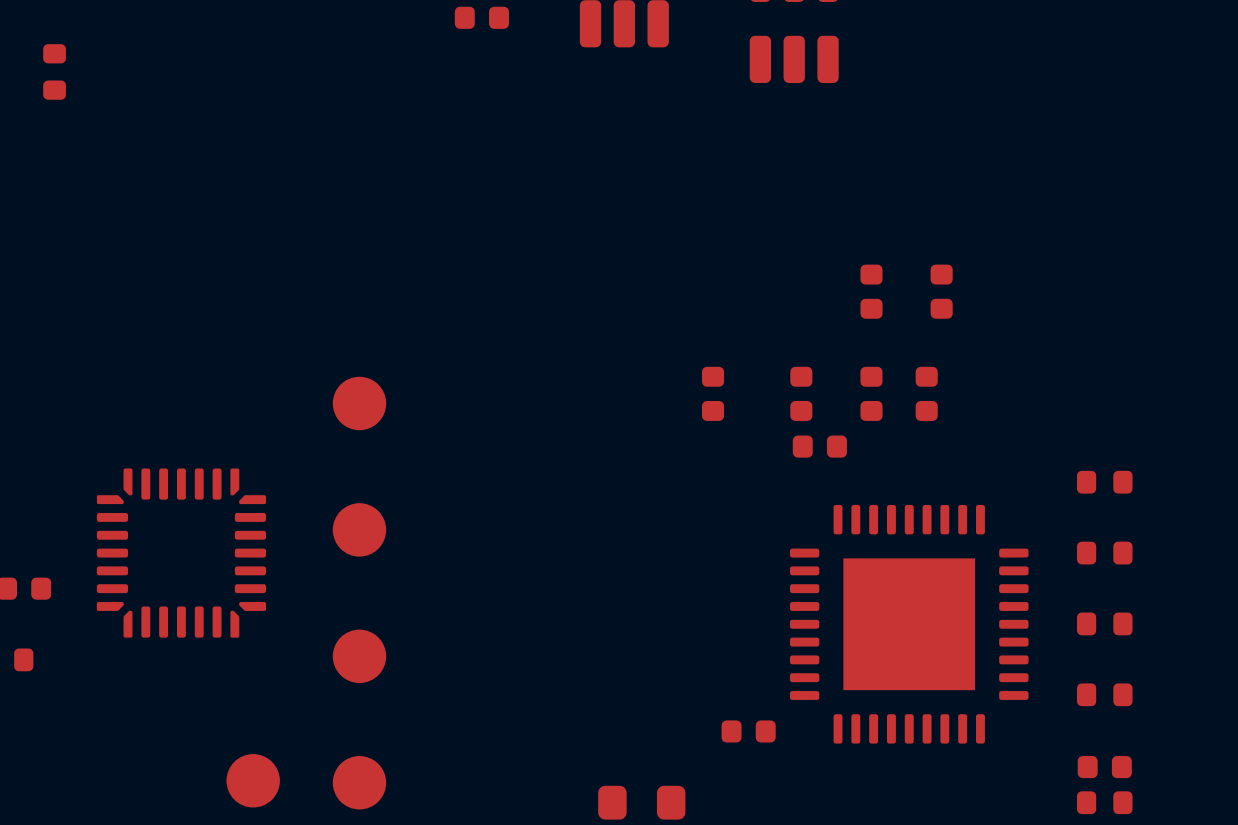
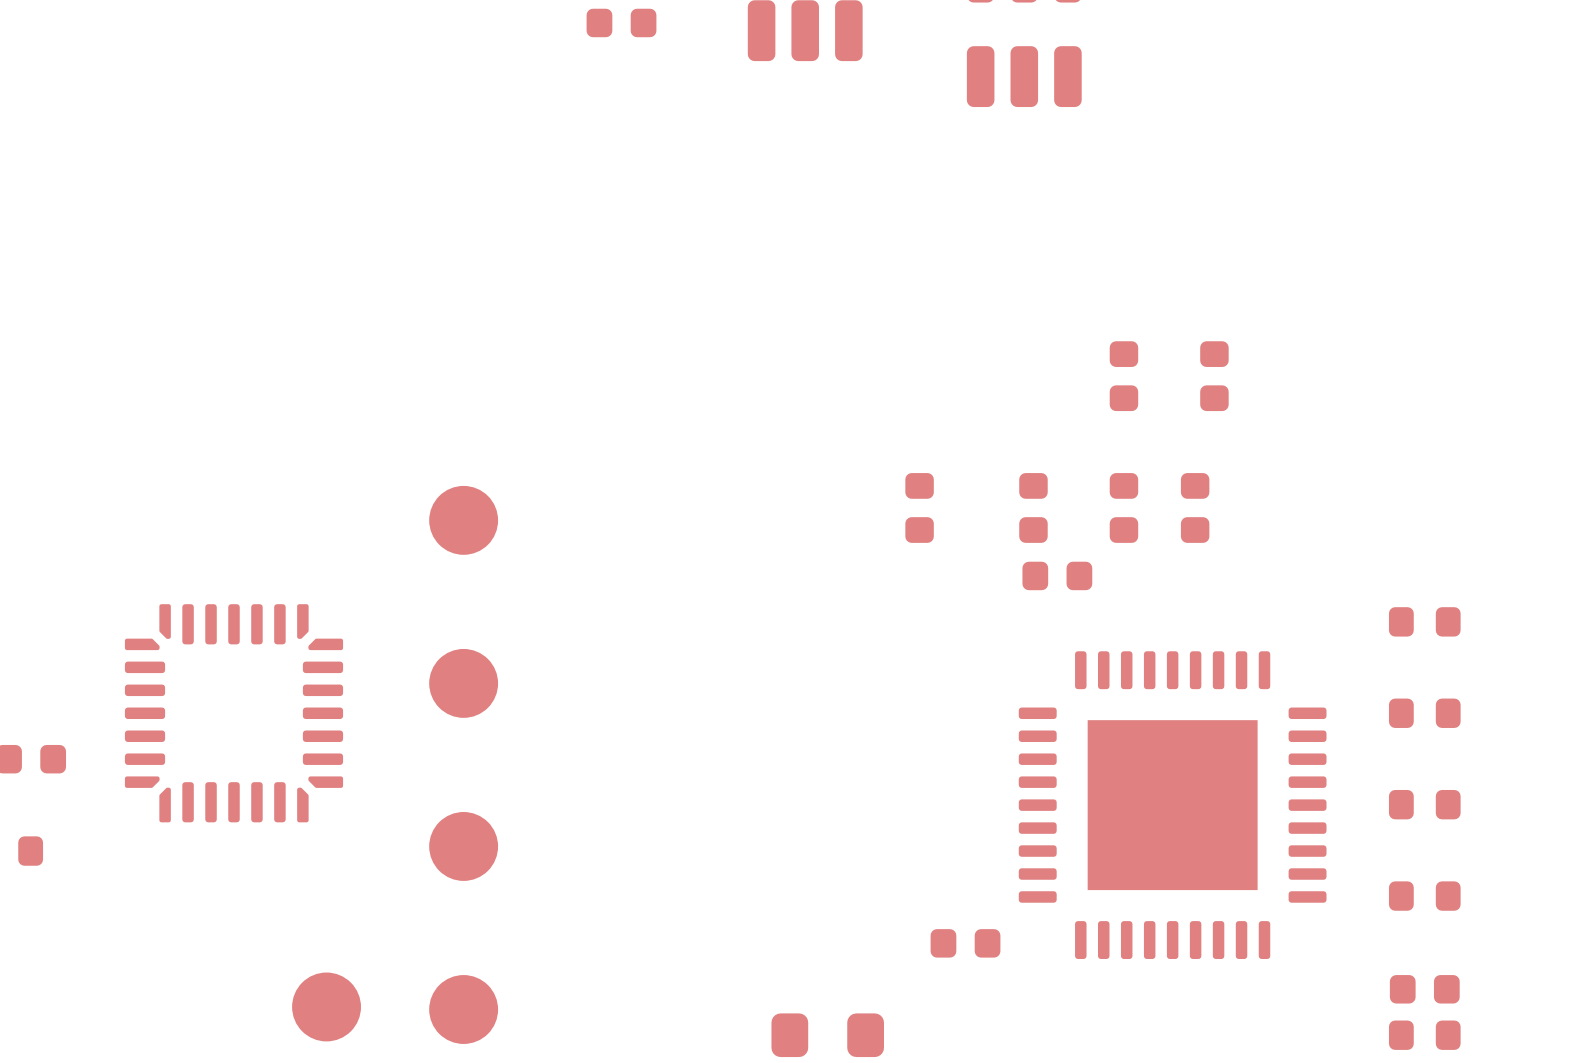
part: (54, 71) -> none

